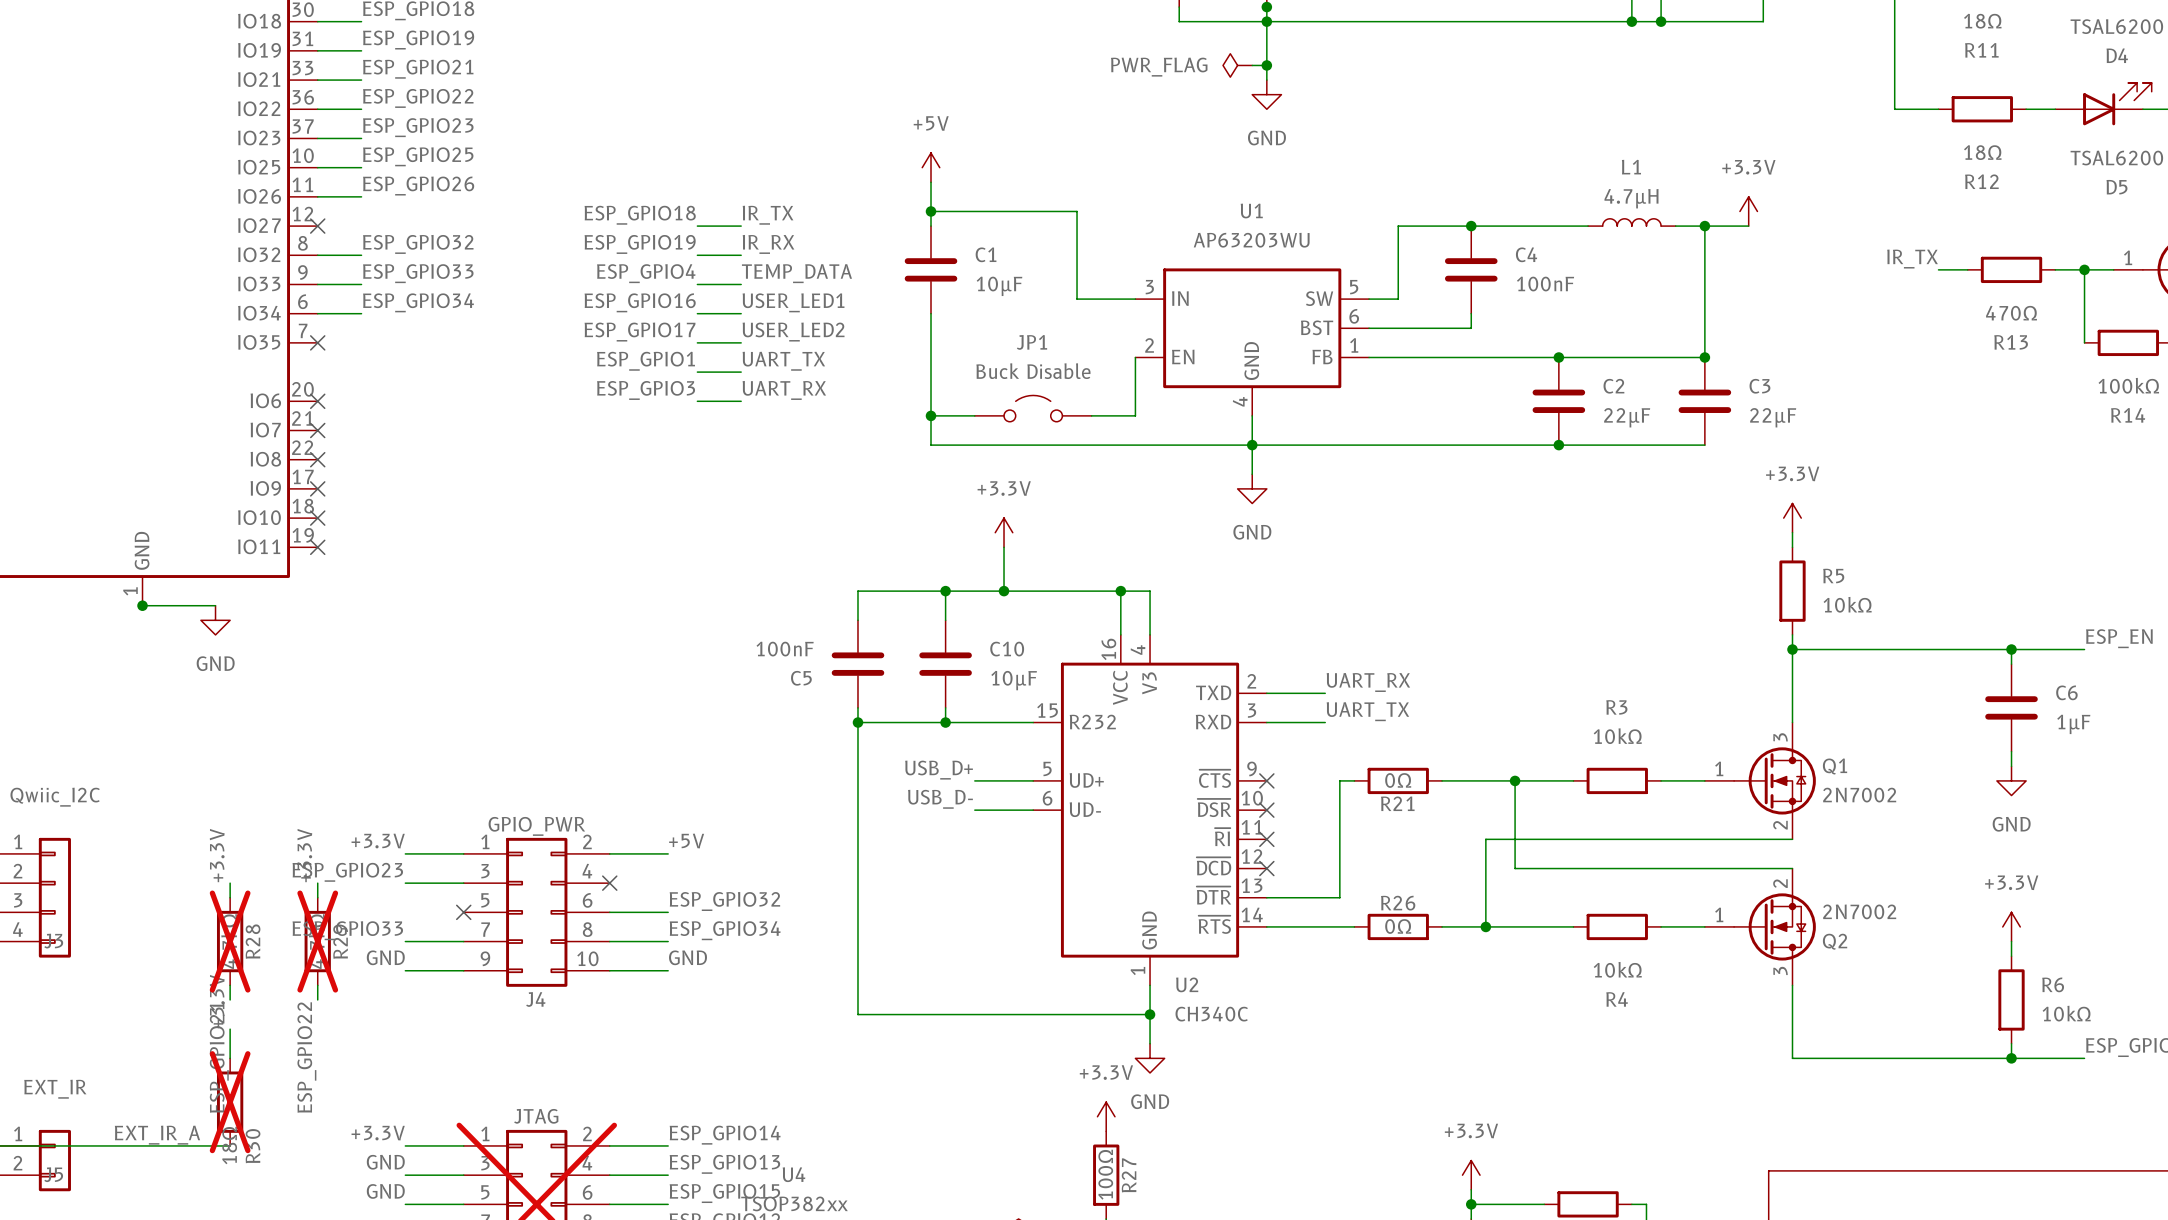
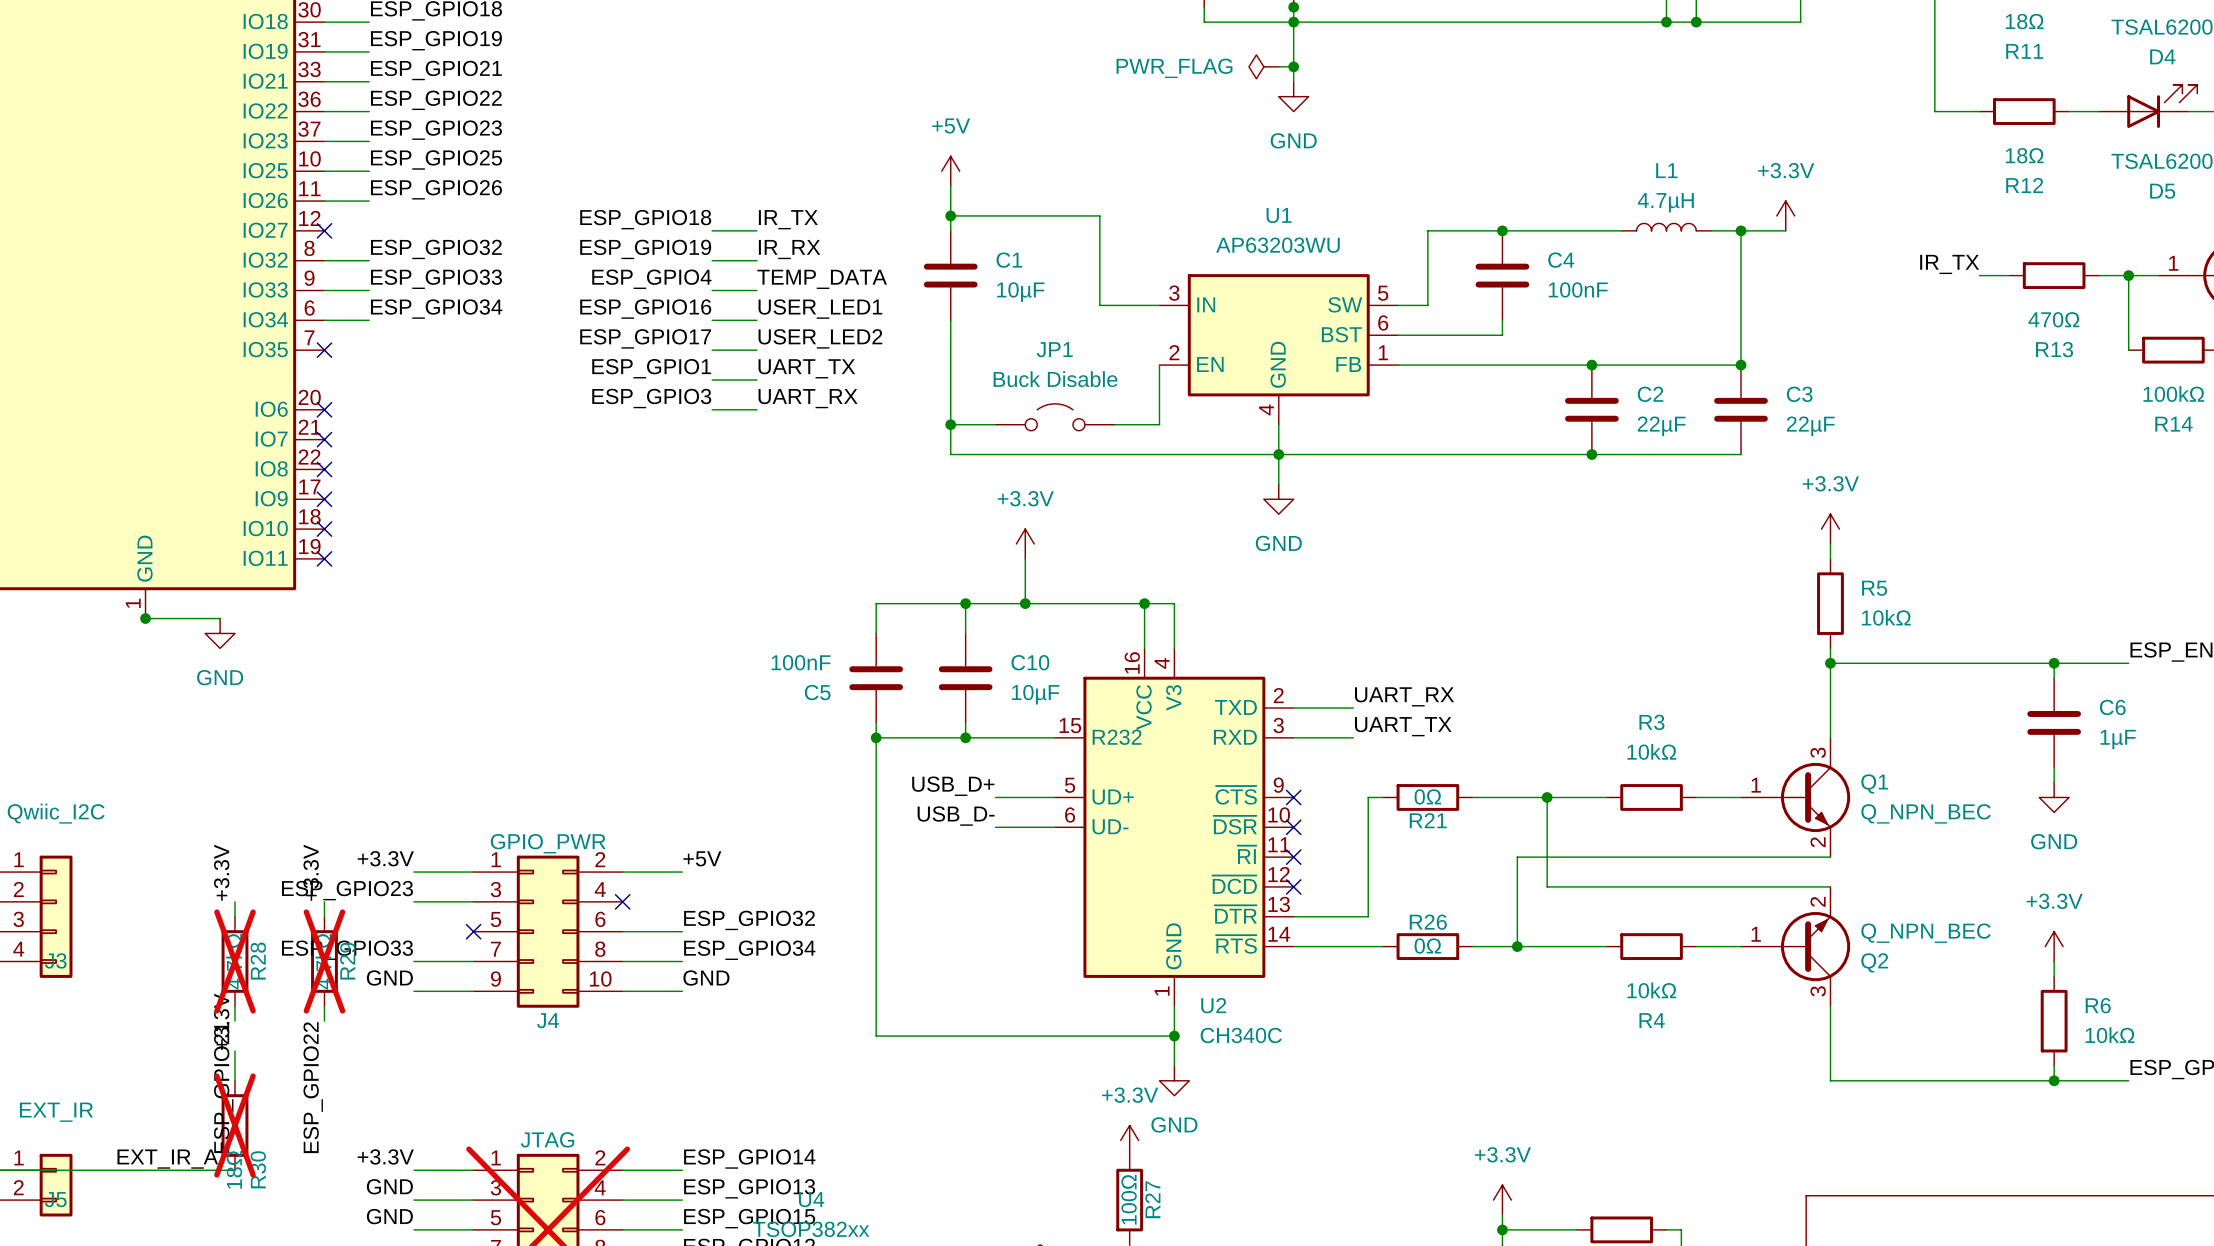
Q1 symbol: [1704, 722, 1816, 840] -> [1741, 737, 1851, 858]
Q1 value: 2N7002 (1859, 795) -> Q_NPN_BEC (1926, 813)
Q2 symbol: [1704, 868, 1816, 986] -> [1741, 886, 1851, 1007]
Q2 value: 2N7002 (1859, 911) -> Q_NPN_BEC (1926, 933)

